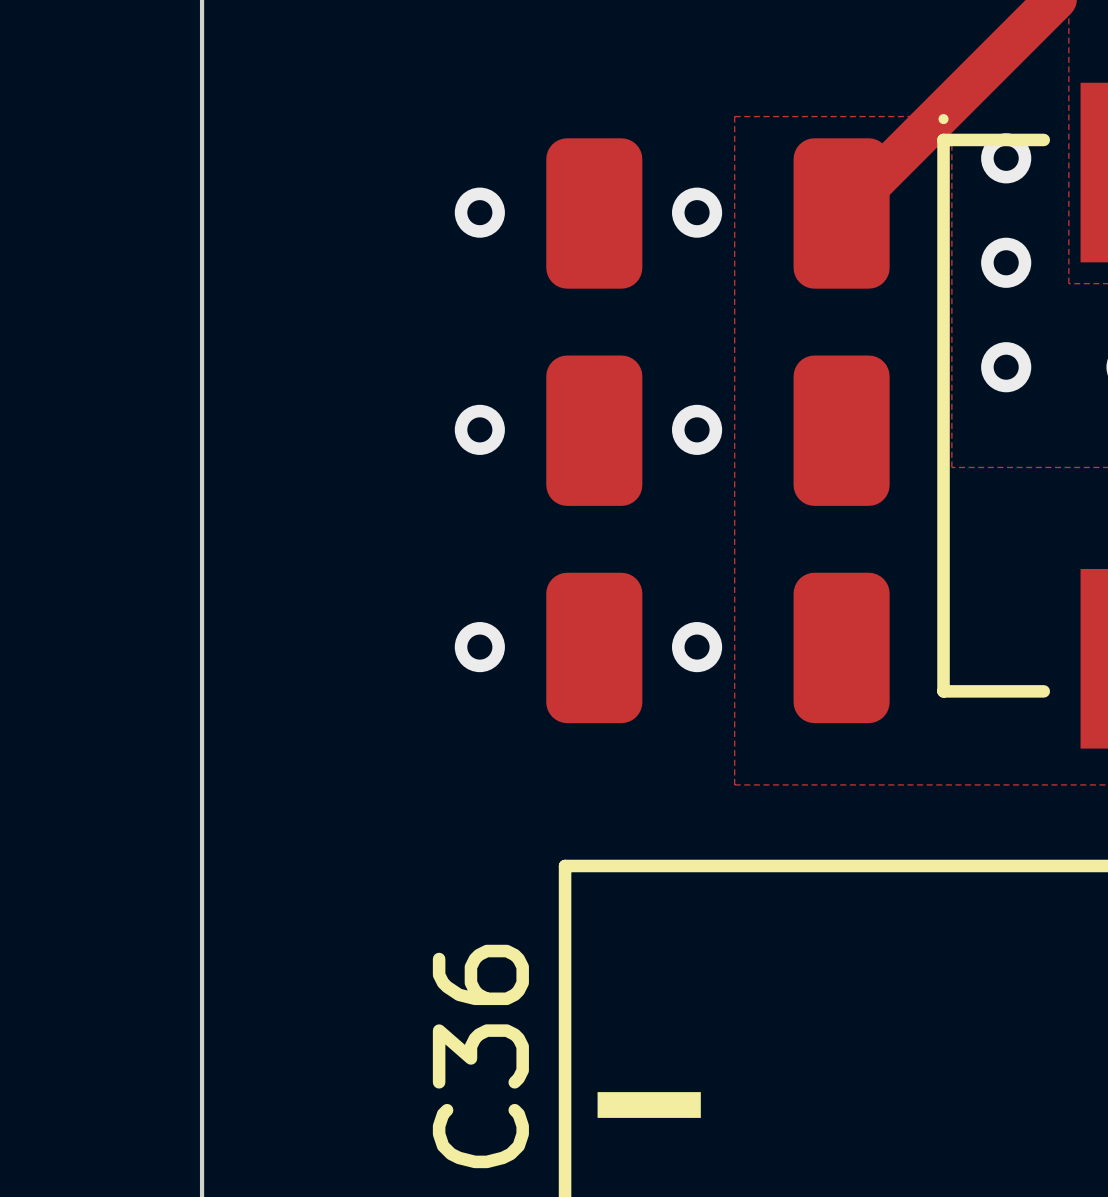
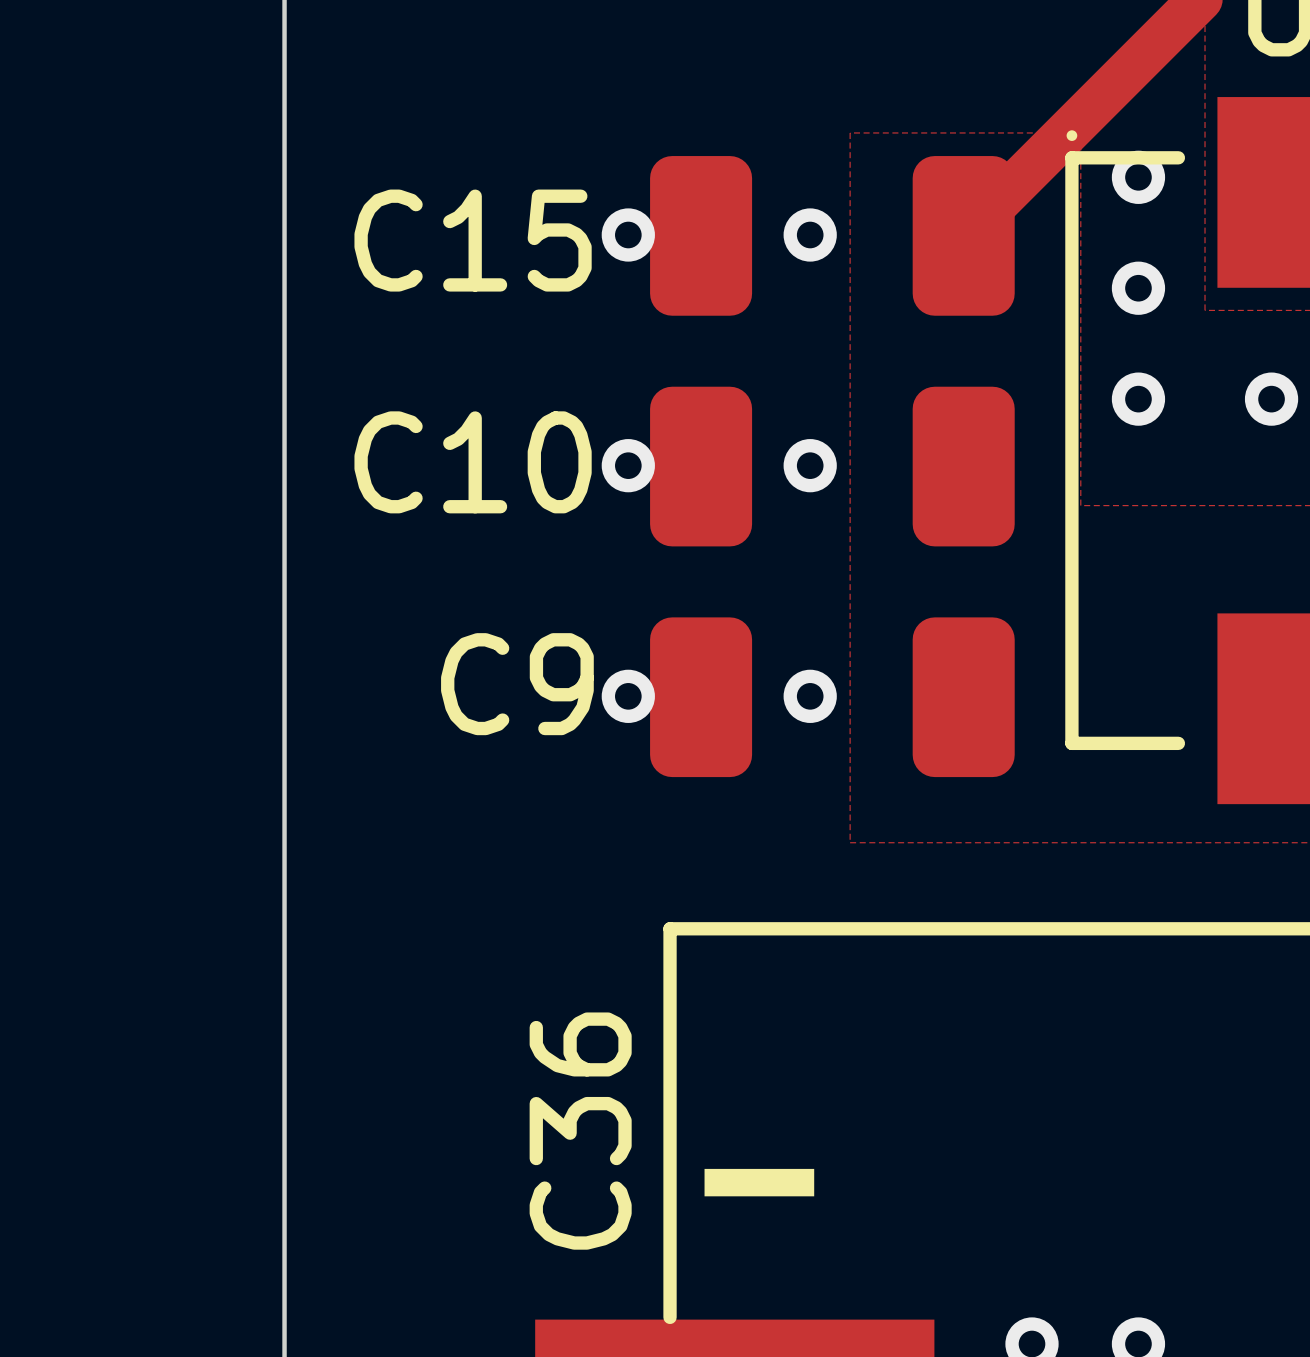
via position: (479, 212) -> (628, 235)
C15 name: none -> C15 (473, 240)
C10 name: none -> C10 (473, 462)
via position: (479, 429) -> (628, 465)
C9 name: none -> C9 (517, 684)
via position: (479, 647) -> (628, 696)

